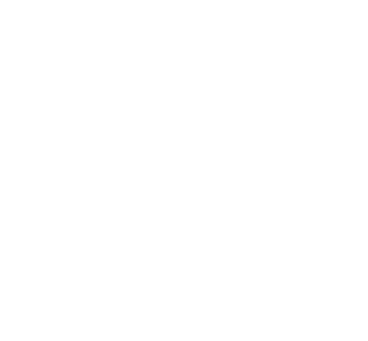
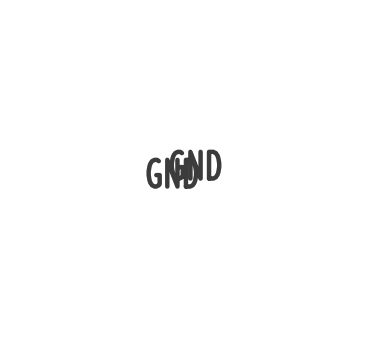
drawing: none -> [146, 149, 222, 189]

